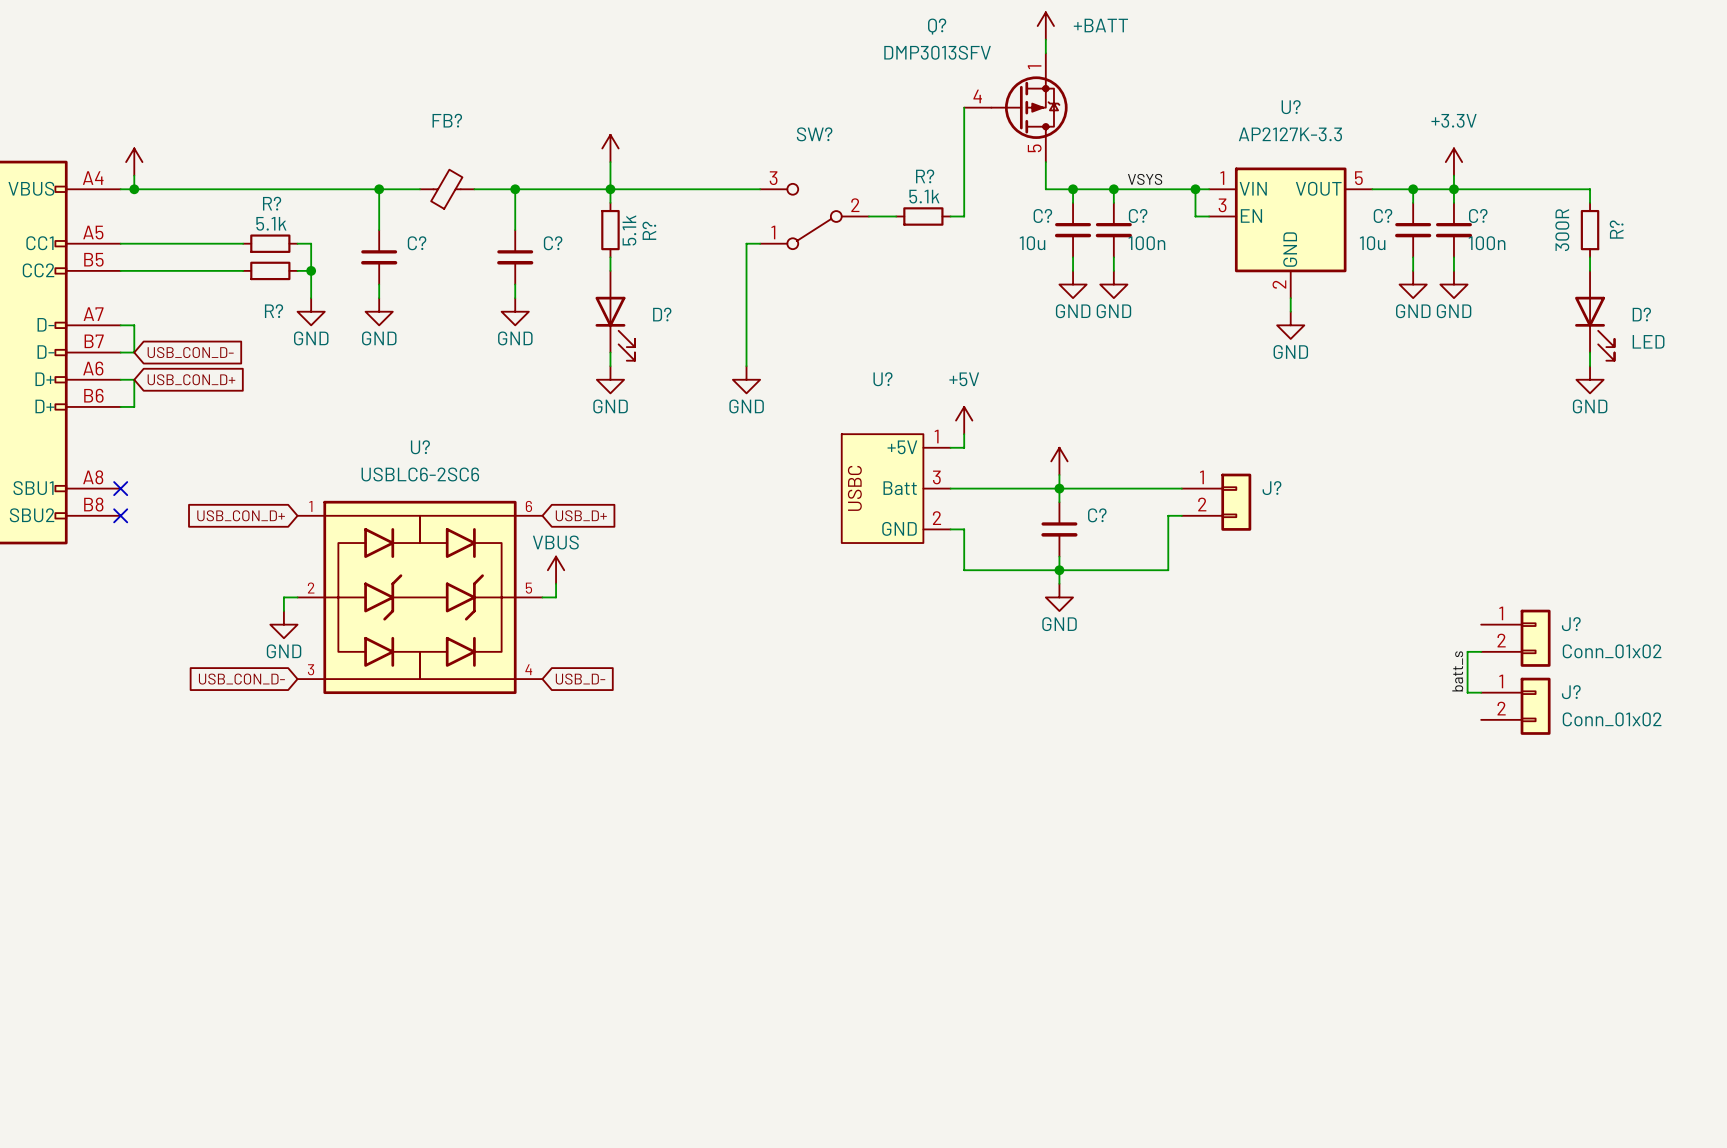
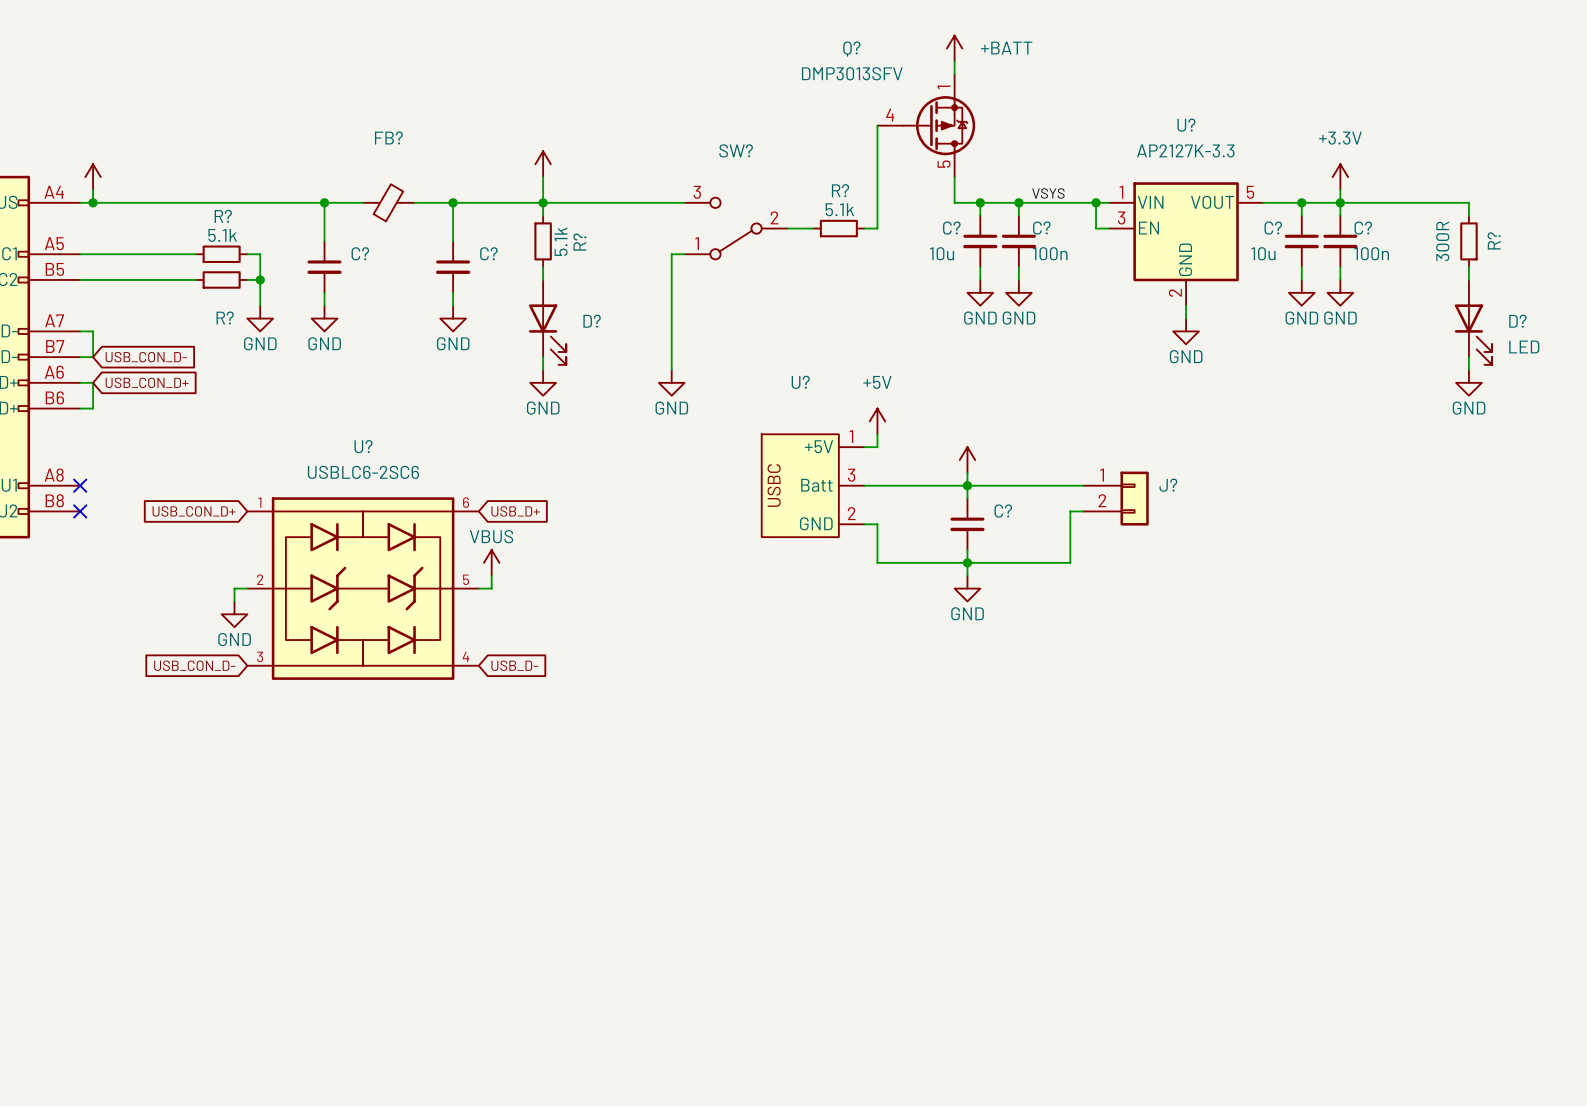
J?: Conn_01x02 (1515, 638) -> none
wire: (1481, 651) (1467, 651) (1467, 692) (1481, 692) -> none
label: batt_s (1457, 671) -> none
J?: Conn_01x02 (1515, 706) -> none

